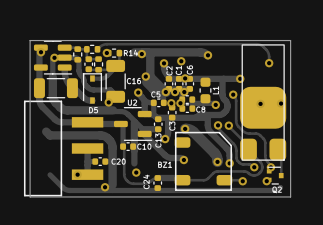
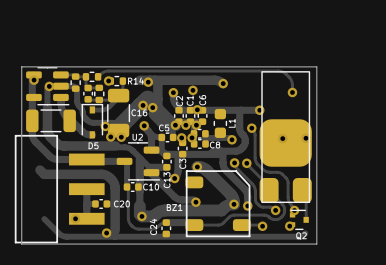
track: none -> (157, 98) (147, 98) (118, 127) (118, 130)
via: none -> (143, 105)
via: none -> (105, 126)
via: none -> (121, 137)
track: none -> (234, 204) (227, 205) (221, 210) (162, 210) (154, 216) (141, 216) (139, 214) (139, 206)

